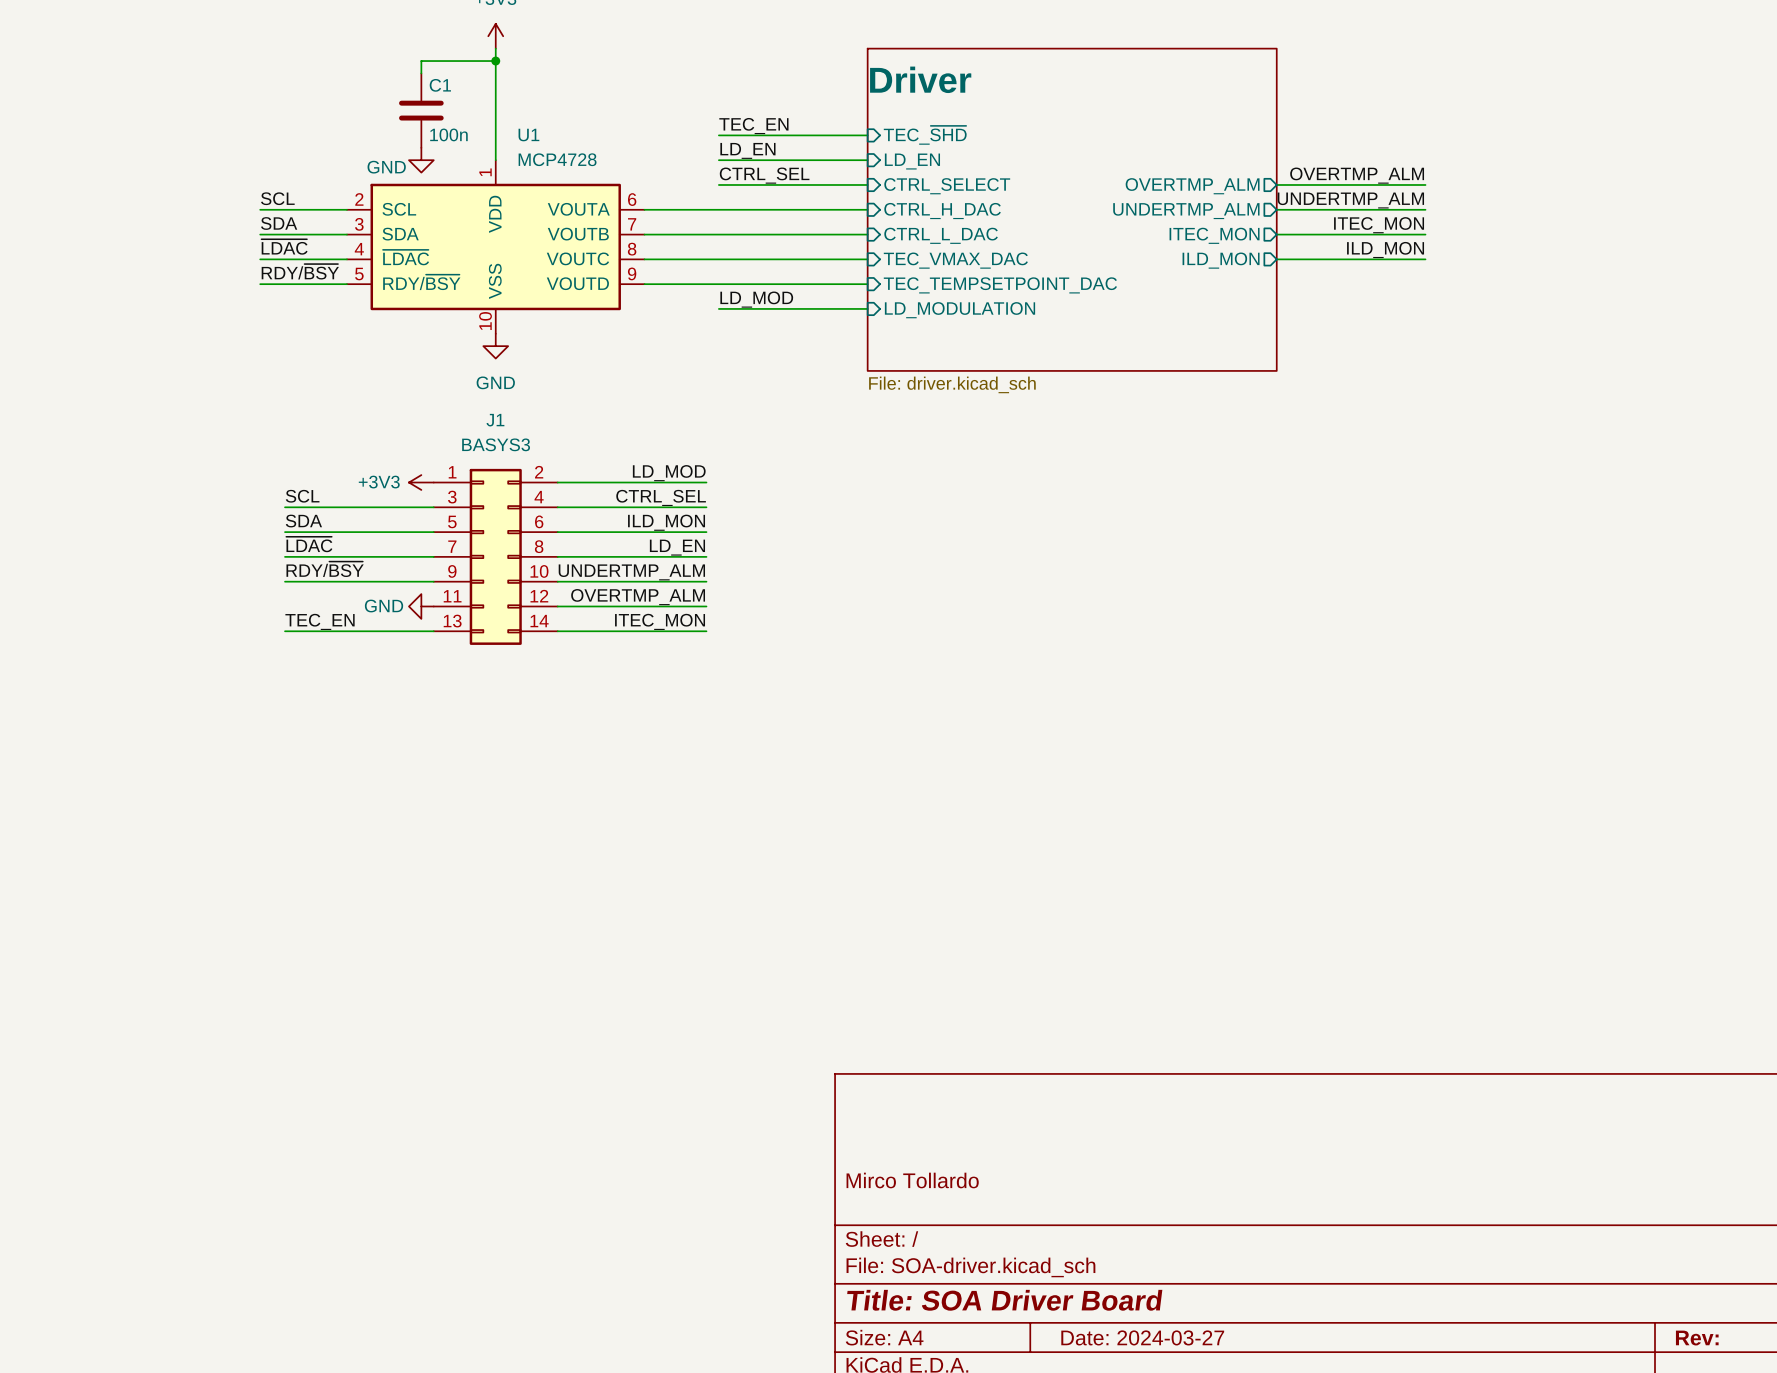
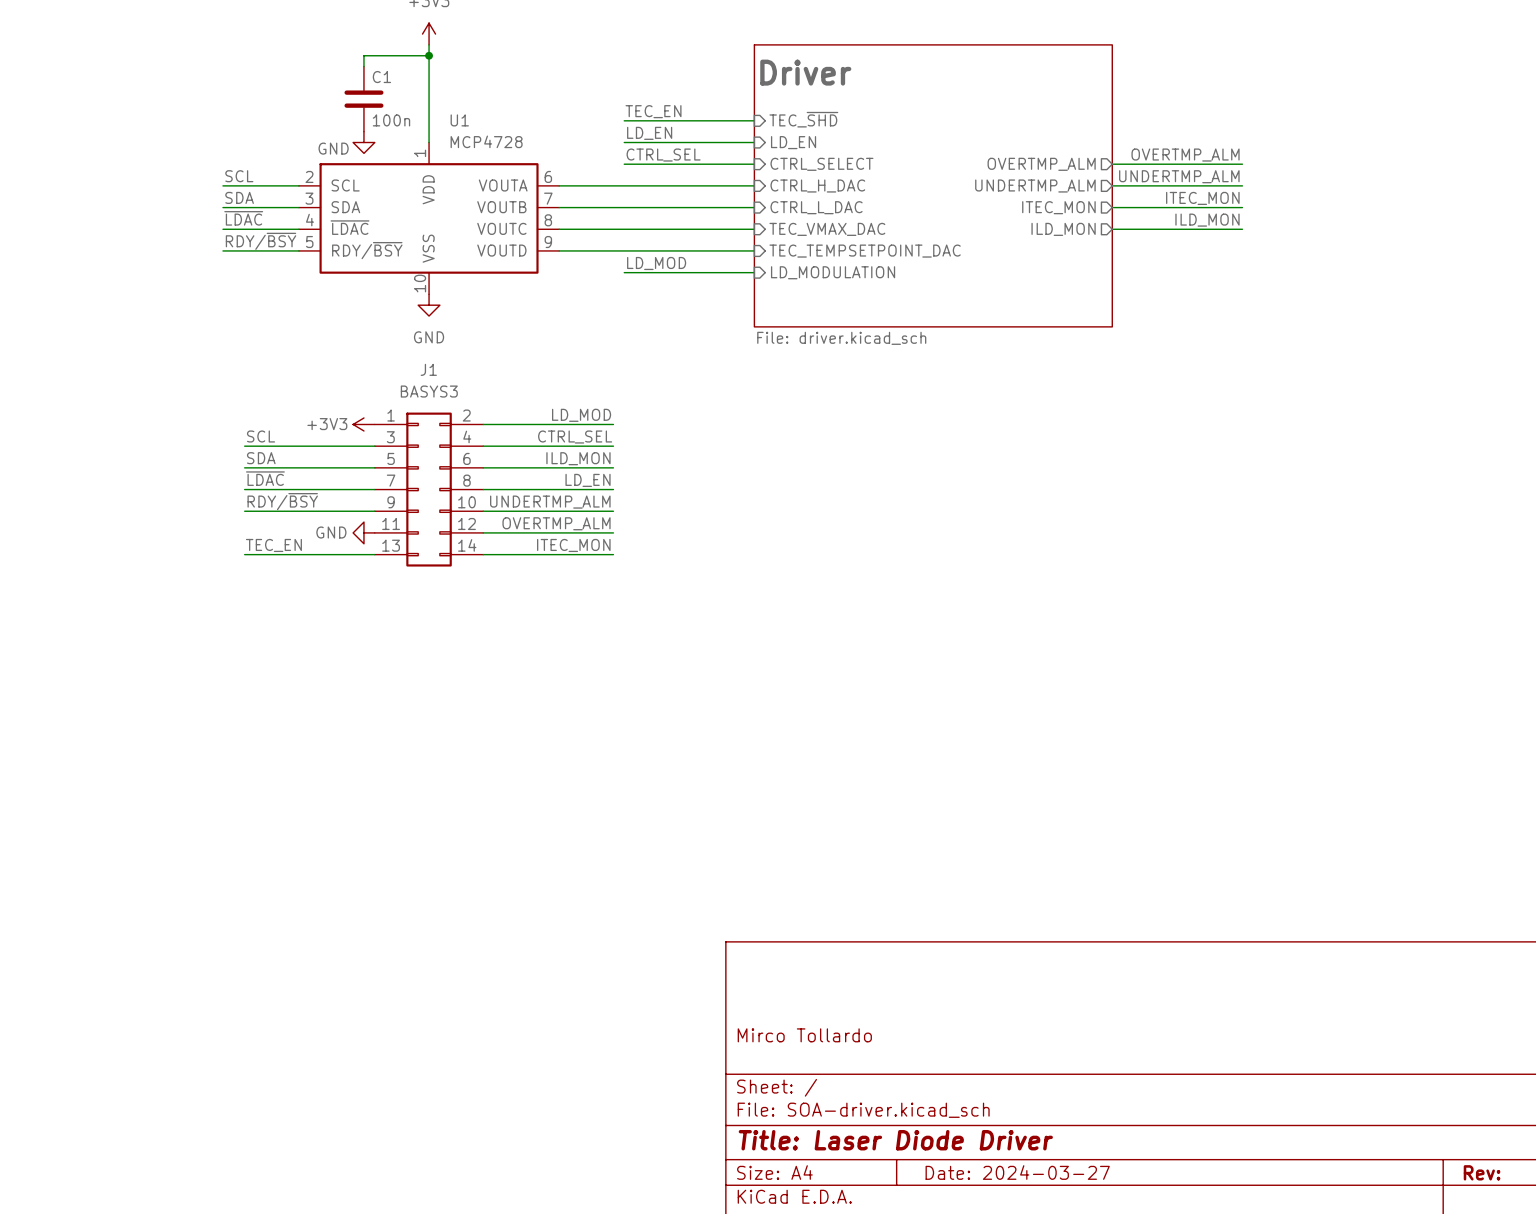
title block: Title: SOA Driver Board (1004, 1300) -> Title: Laser Diode Driver (895, 1140)

